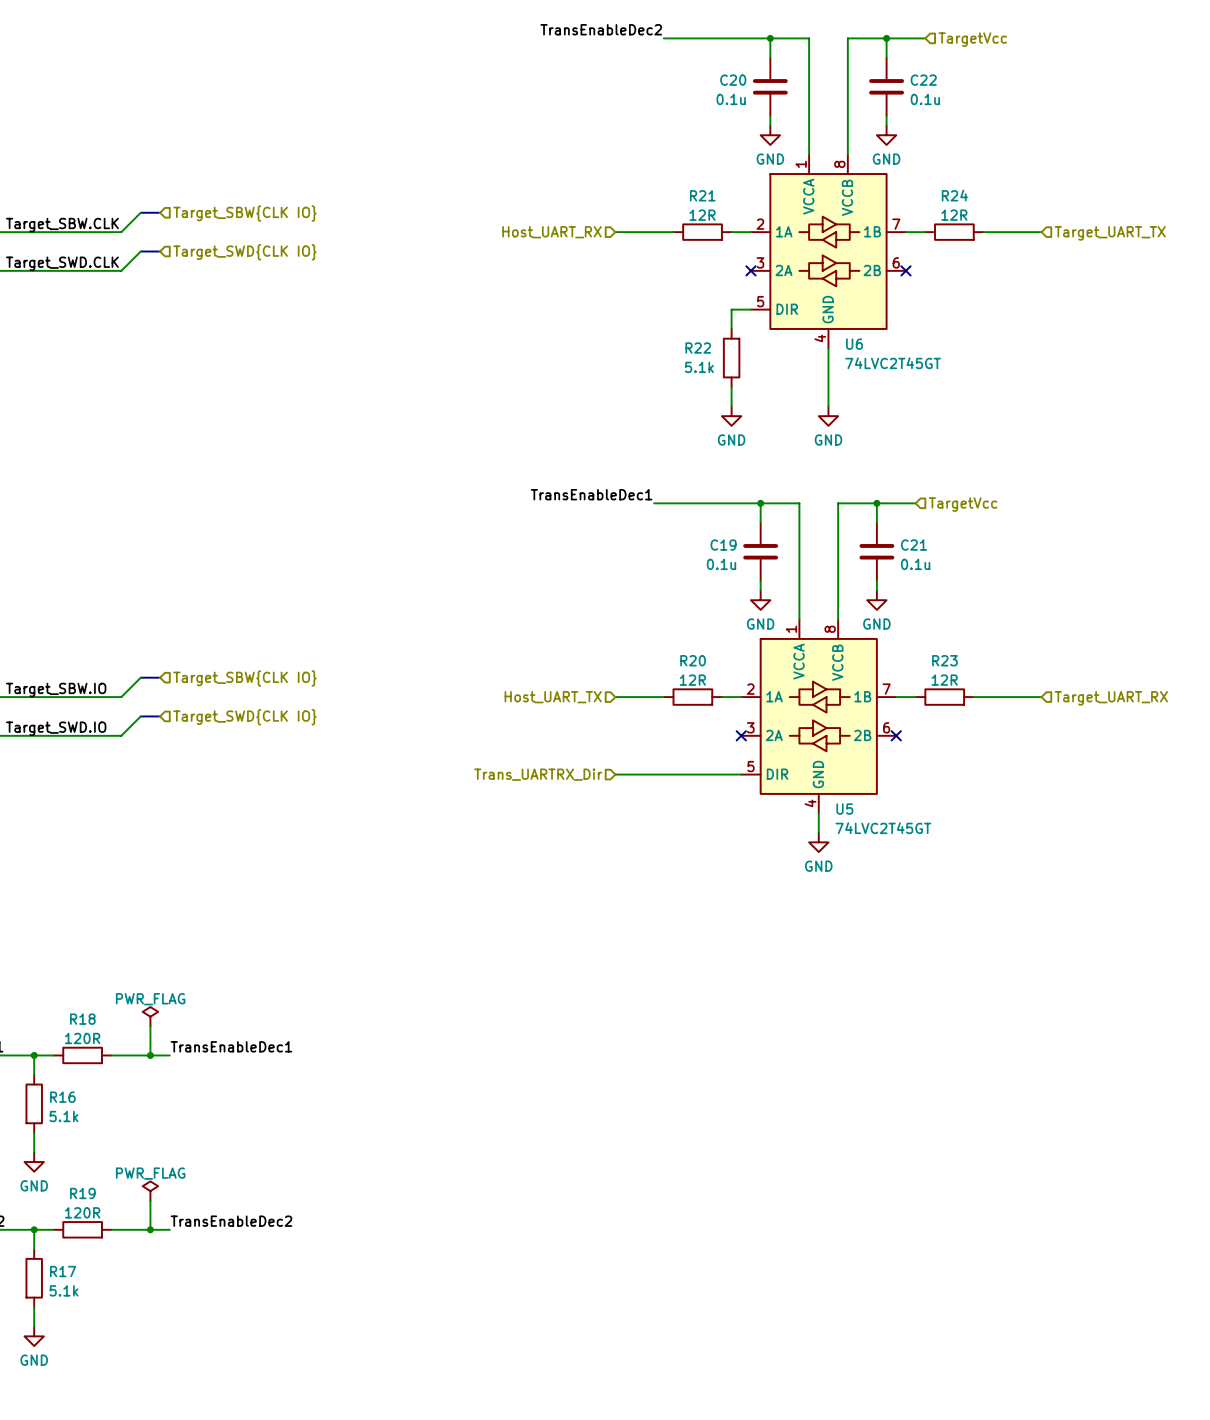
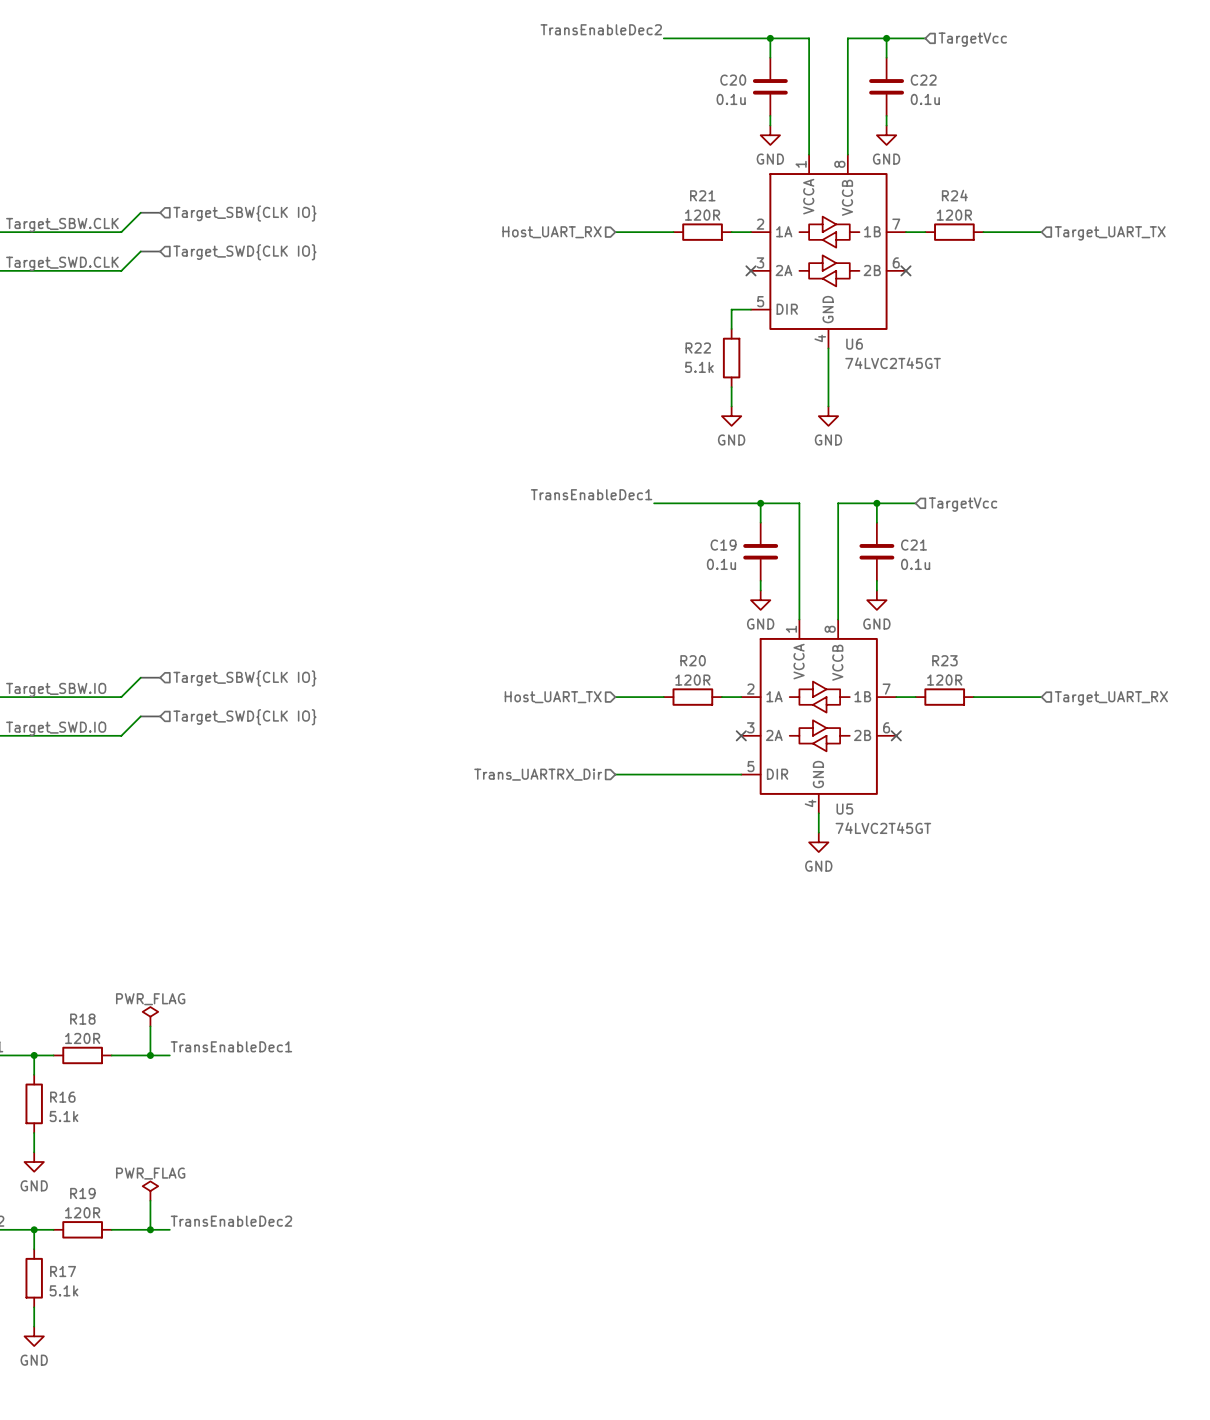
R21 value: 12R (702, 215) -> 120R (702, 215)
R24 value: 12R (954, 215) -> 120R (954, 215)
R20 value: 12R (692, 680) -> 120R (692, 680)
R23 value: 12R (944, 680) -> 120R (944, 680)

